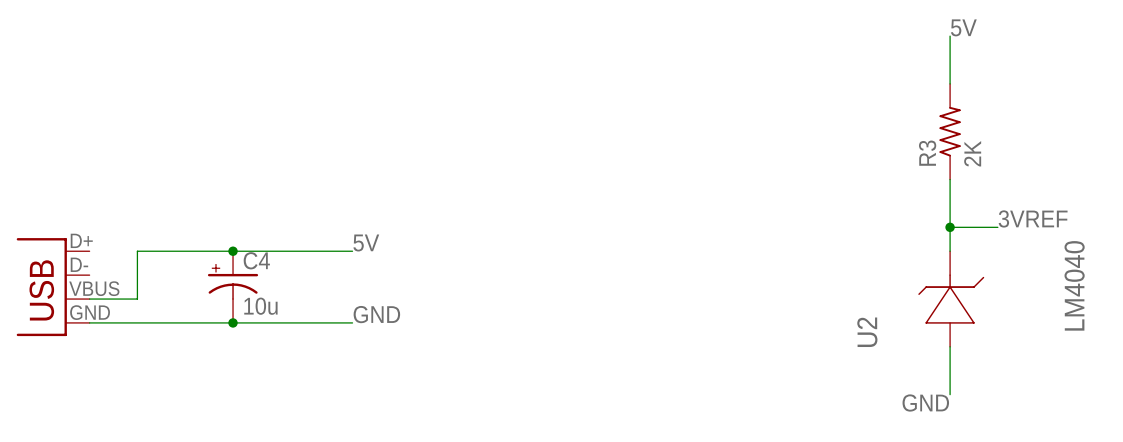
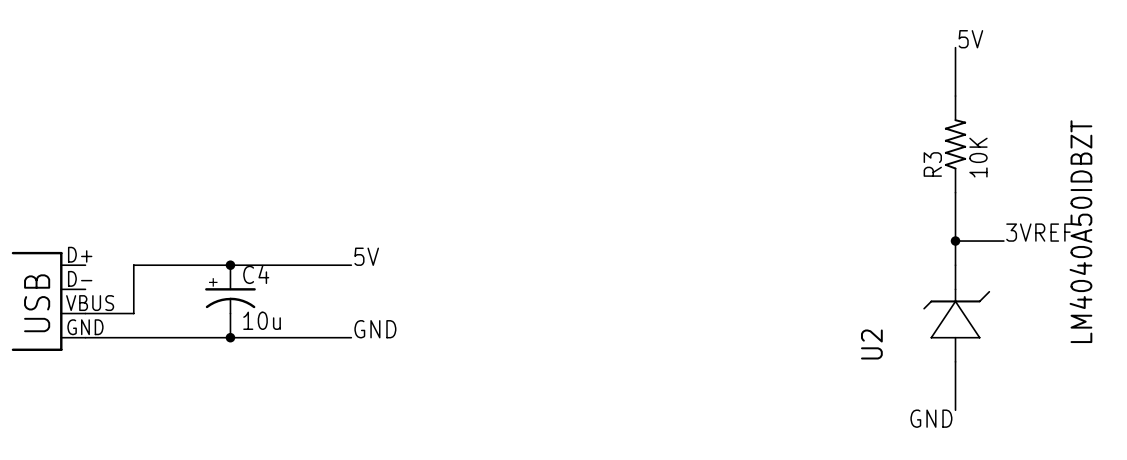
R3 value: 2K (972, 153) -> 10K (978, 157)
U2 value: LM4040 (1074, 285) -> LM4040A50IDBZT (1080, 231)

